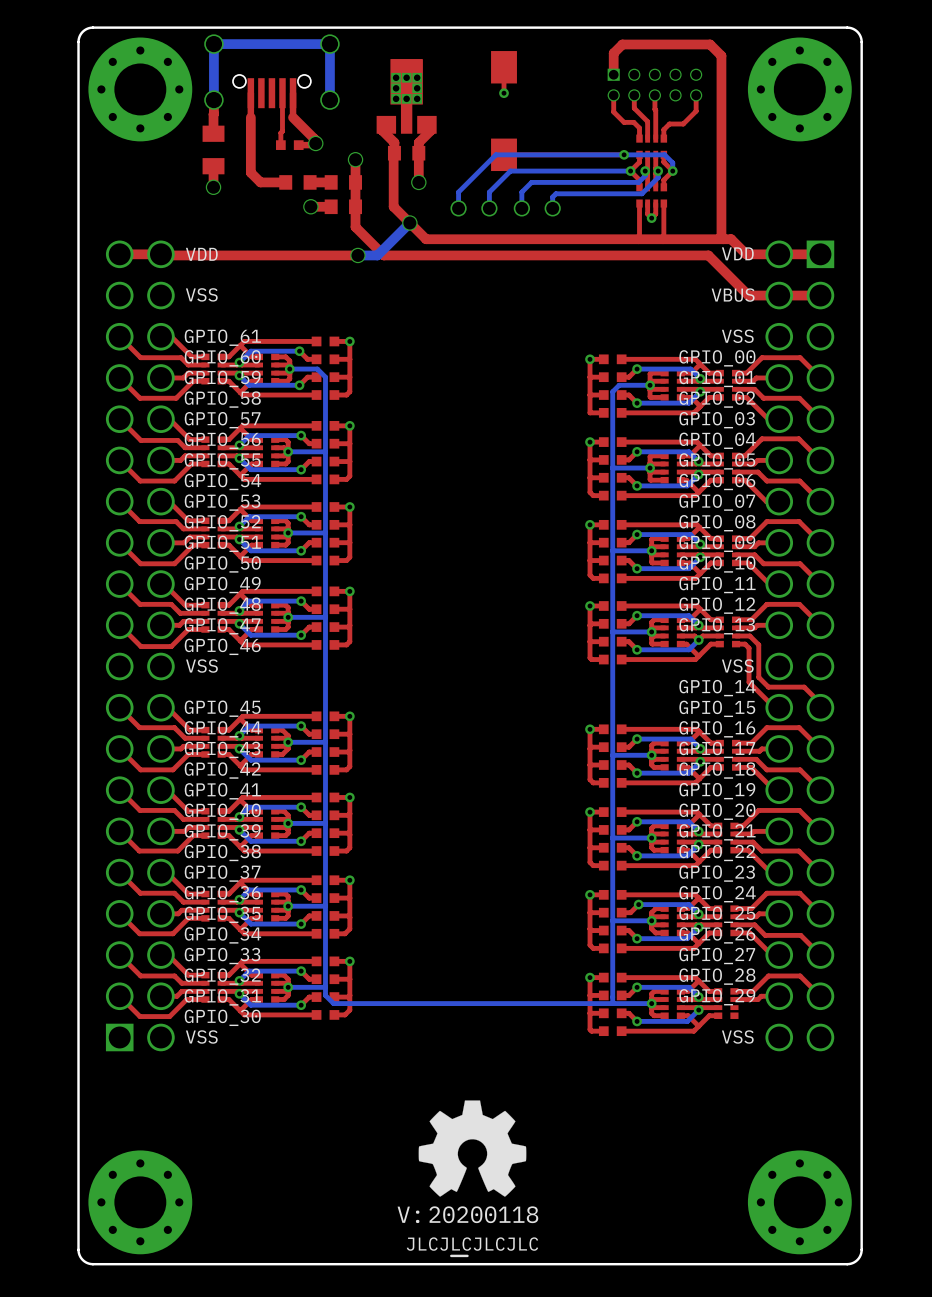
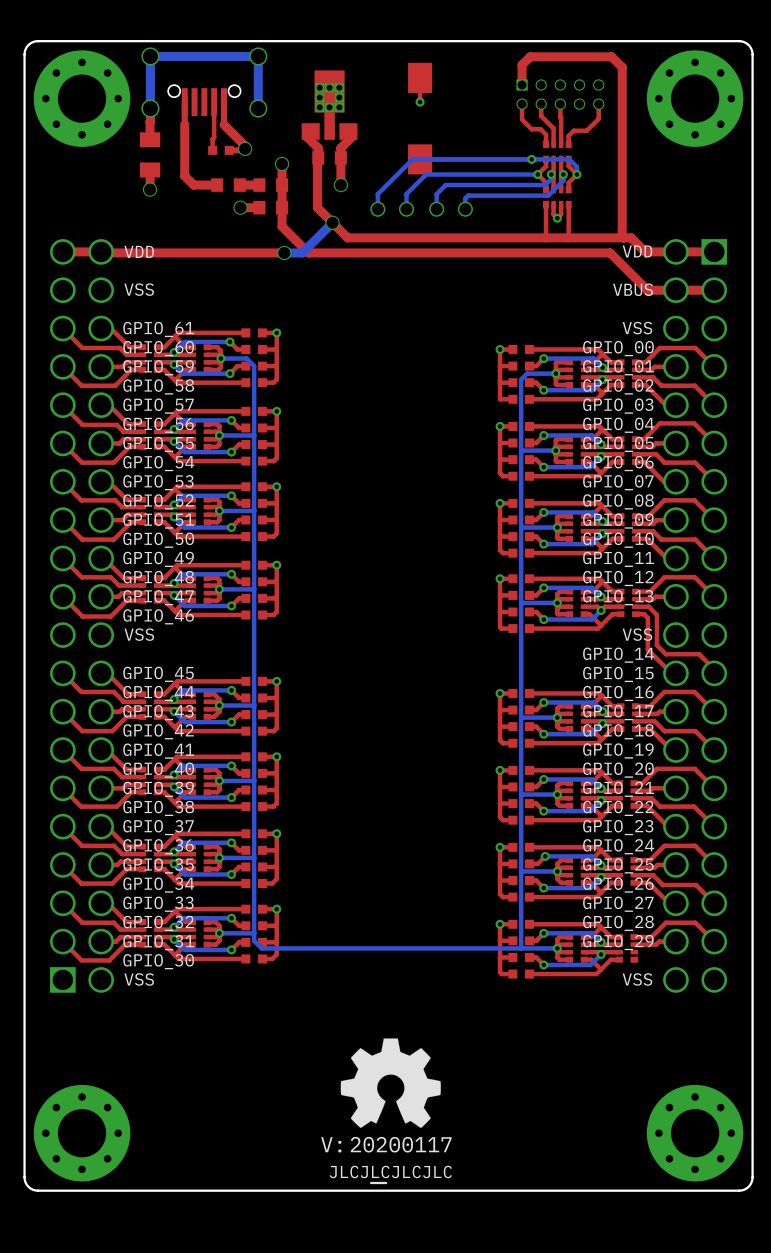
drawing shape: [397, 1206, 539, 1224] -> [321, 1136, 452, 1153]

